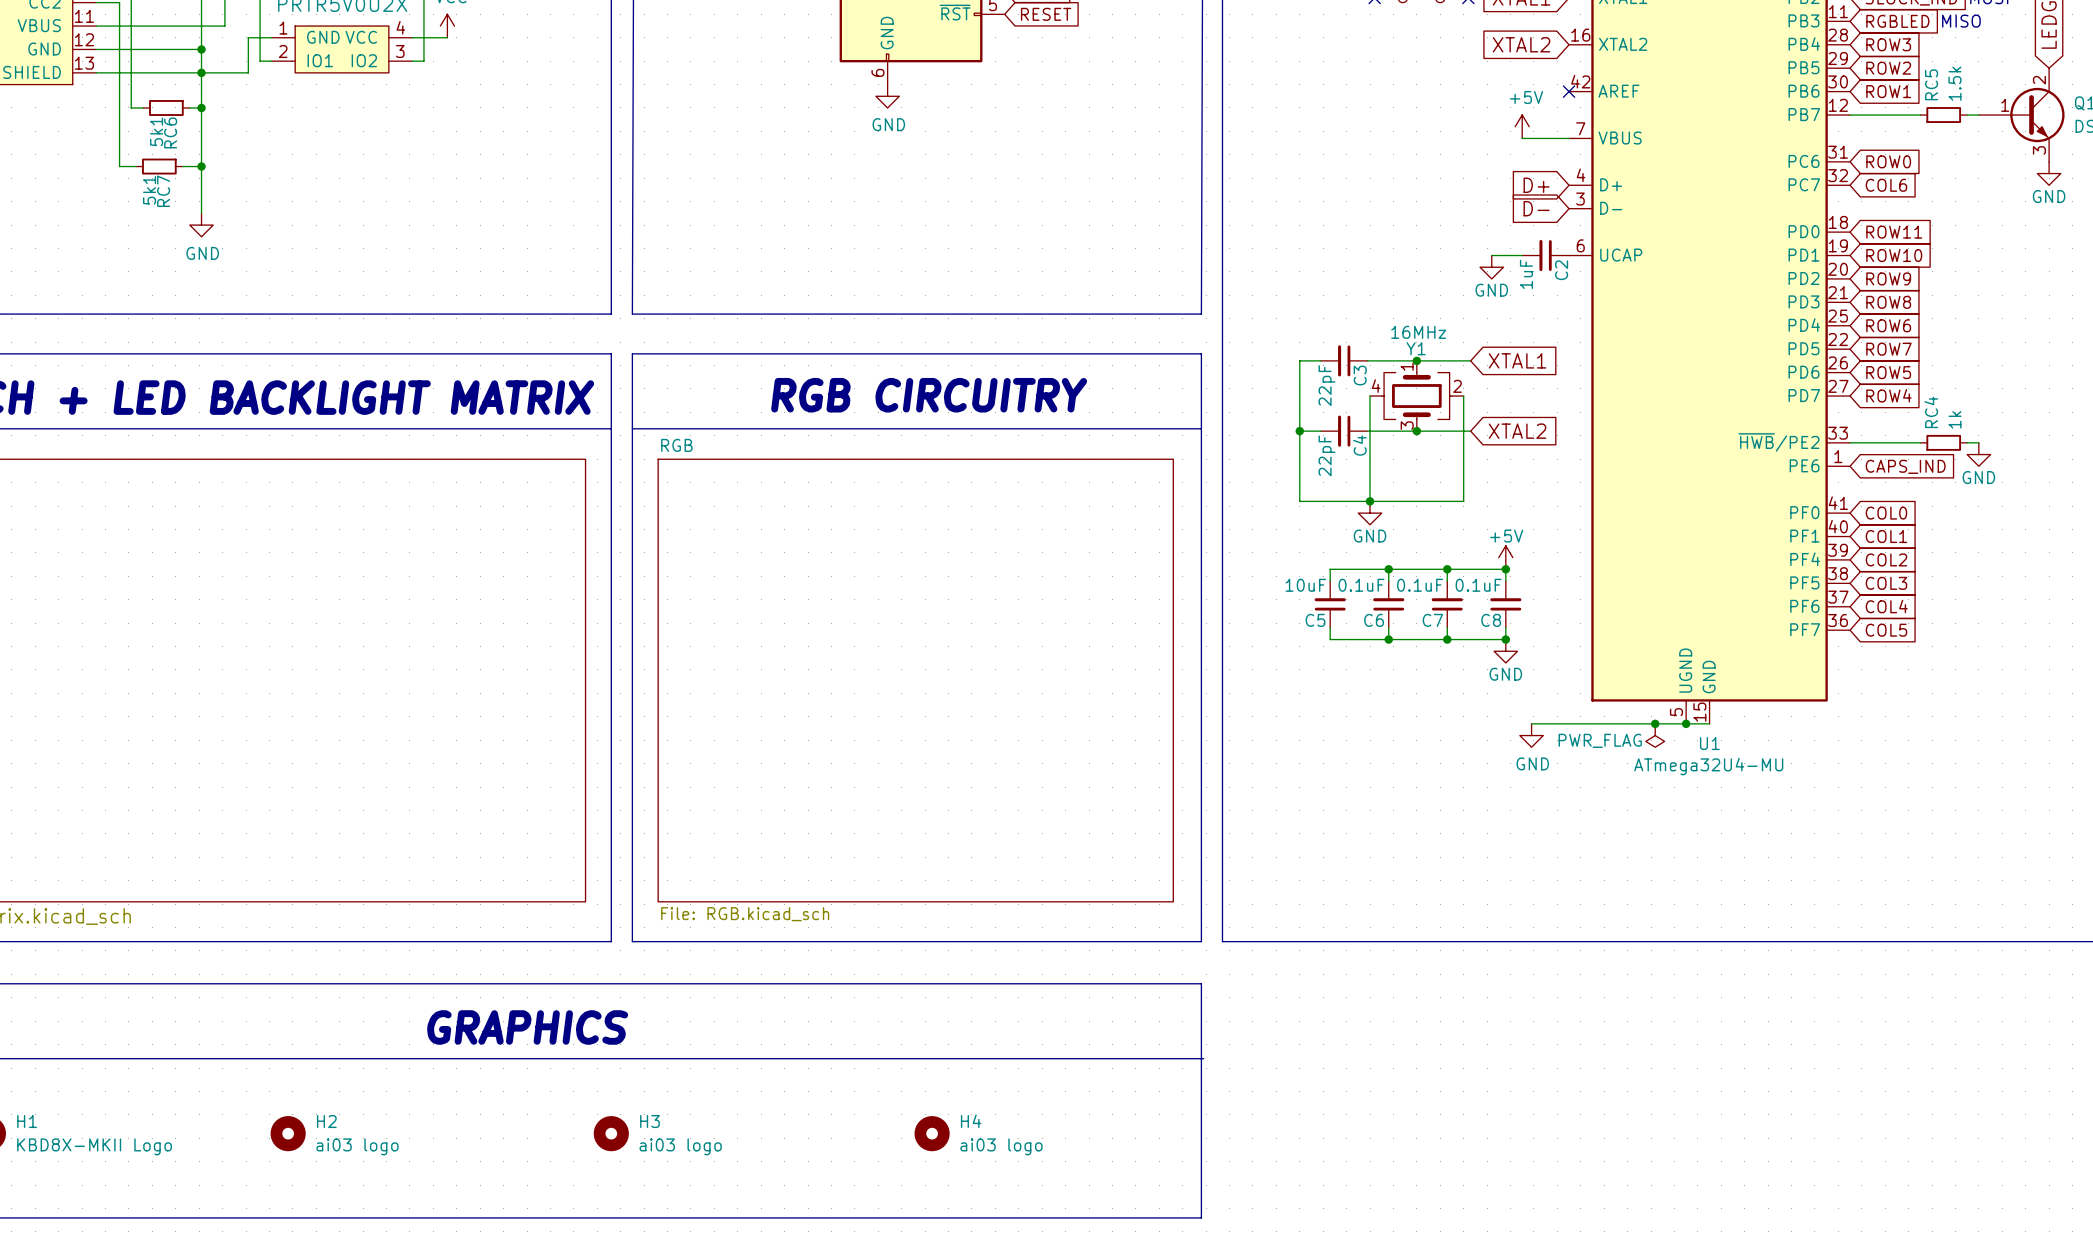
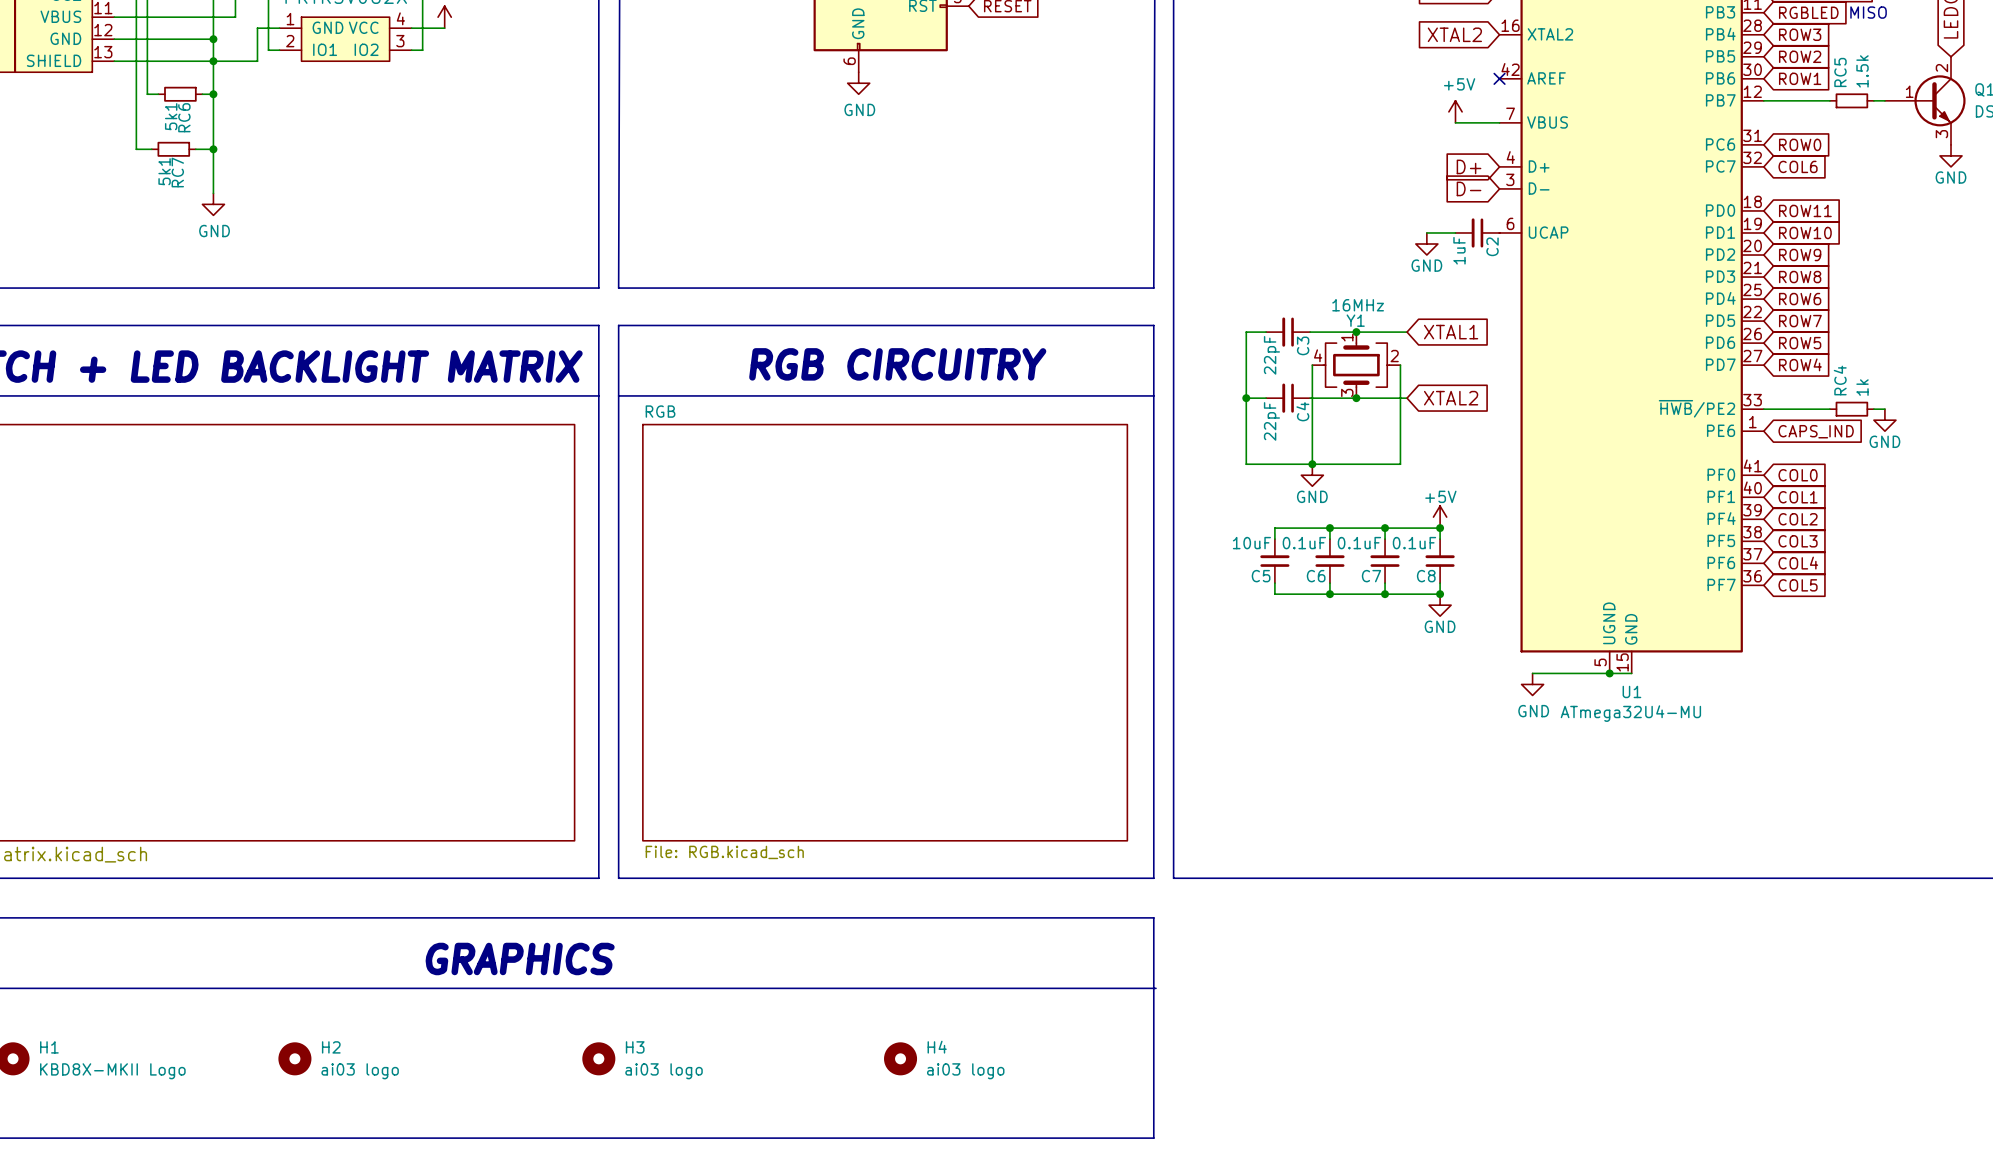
wire: (1531, 723) (1604, 723) -> none
junction: (1655, 723) -> none
power symbol position: GND (1531, 735) -> GND (1532, 684)
power symbol: PWR_FLAG (1655, 735) -> none

